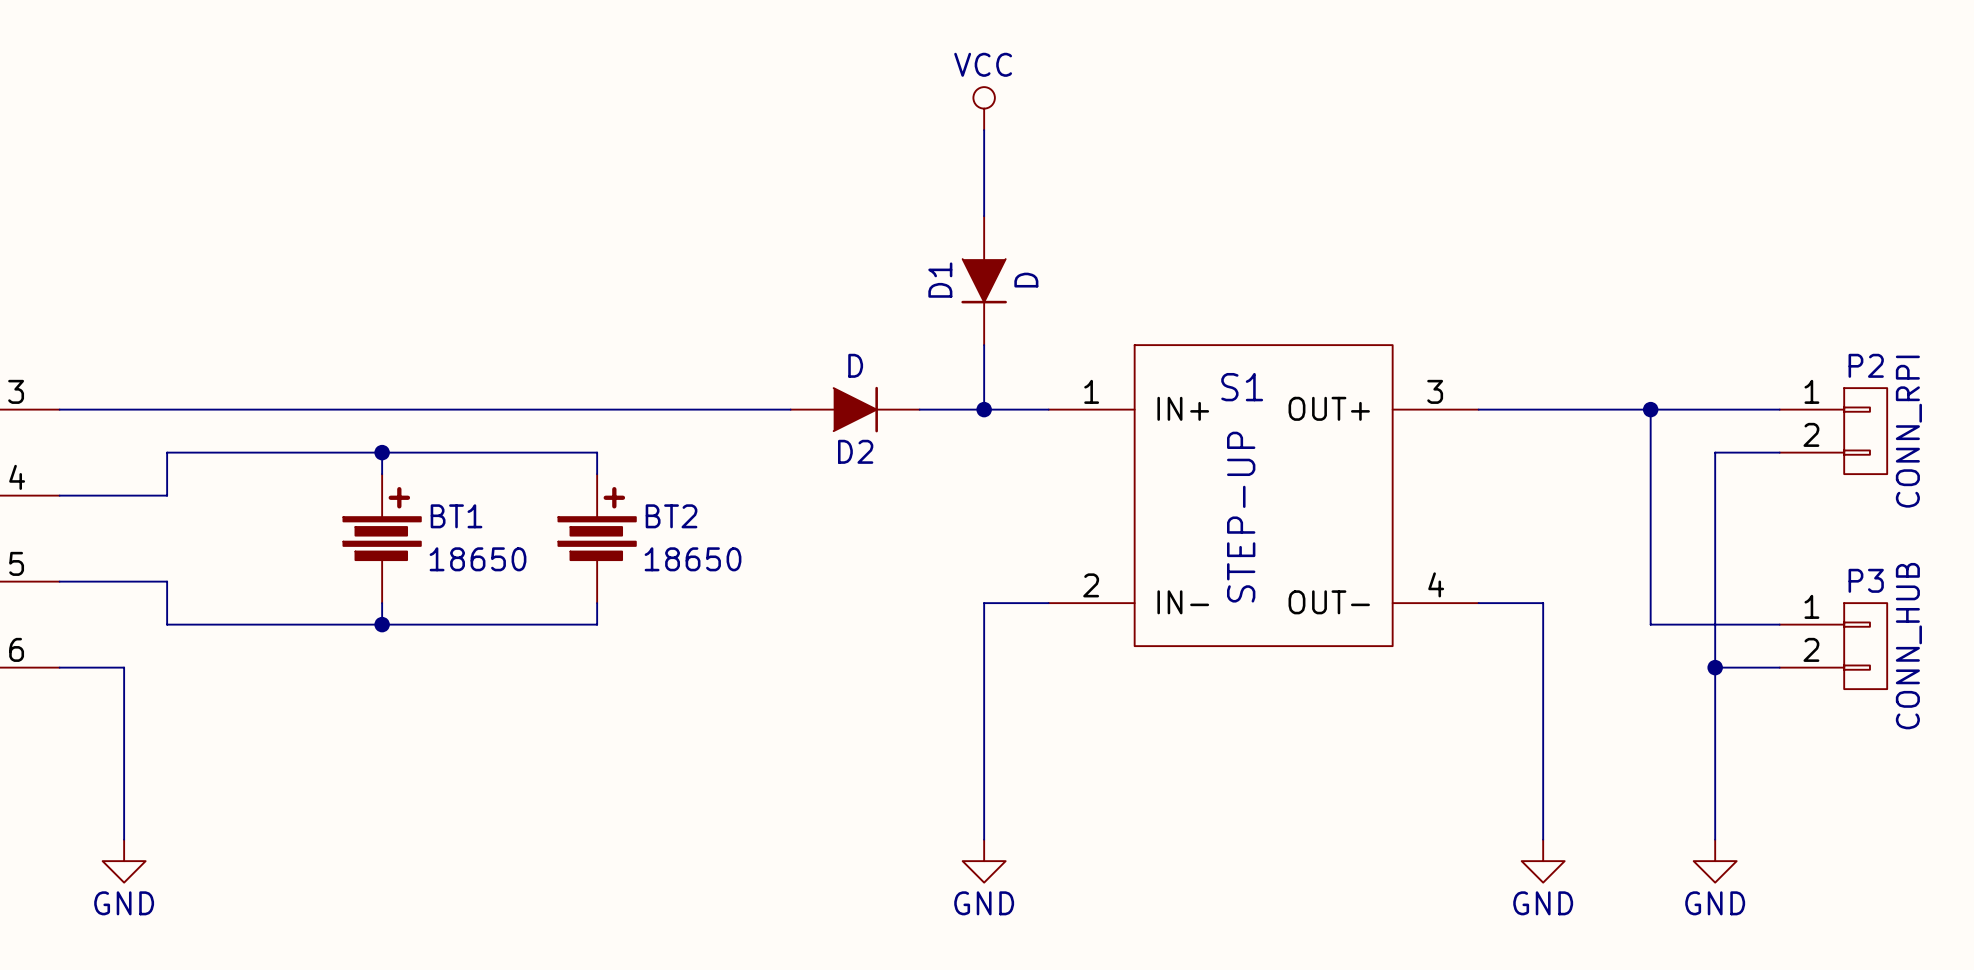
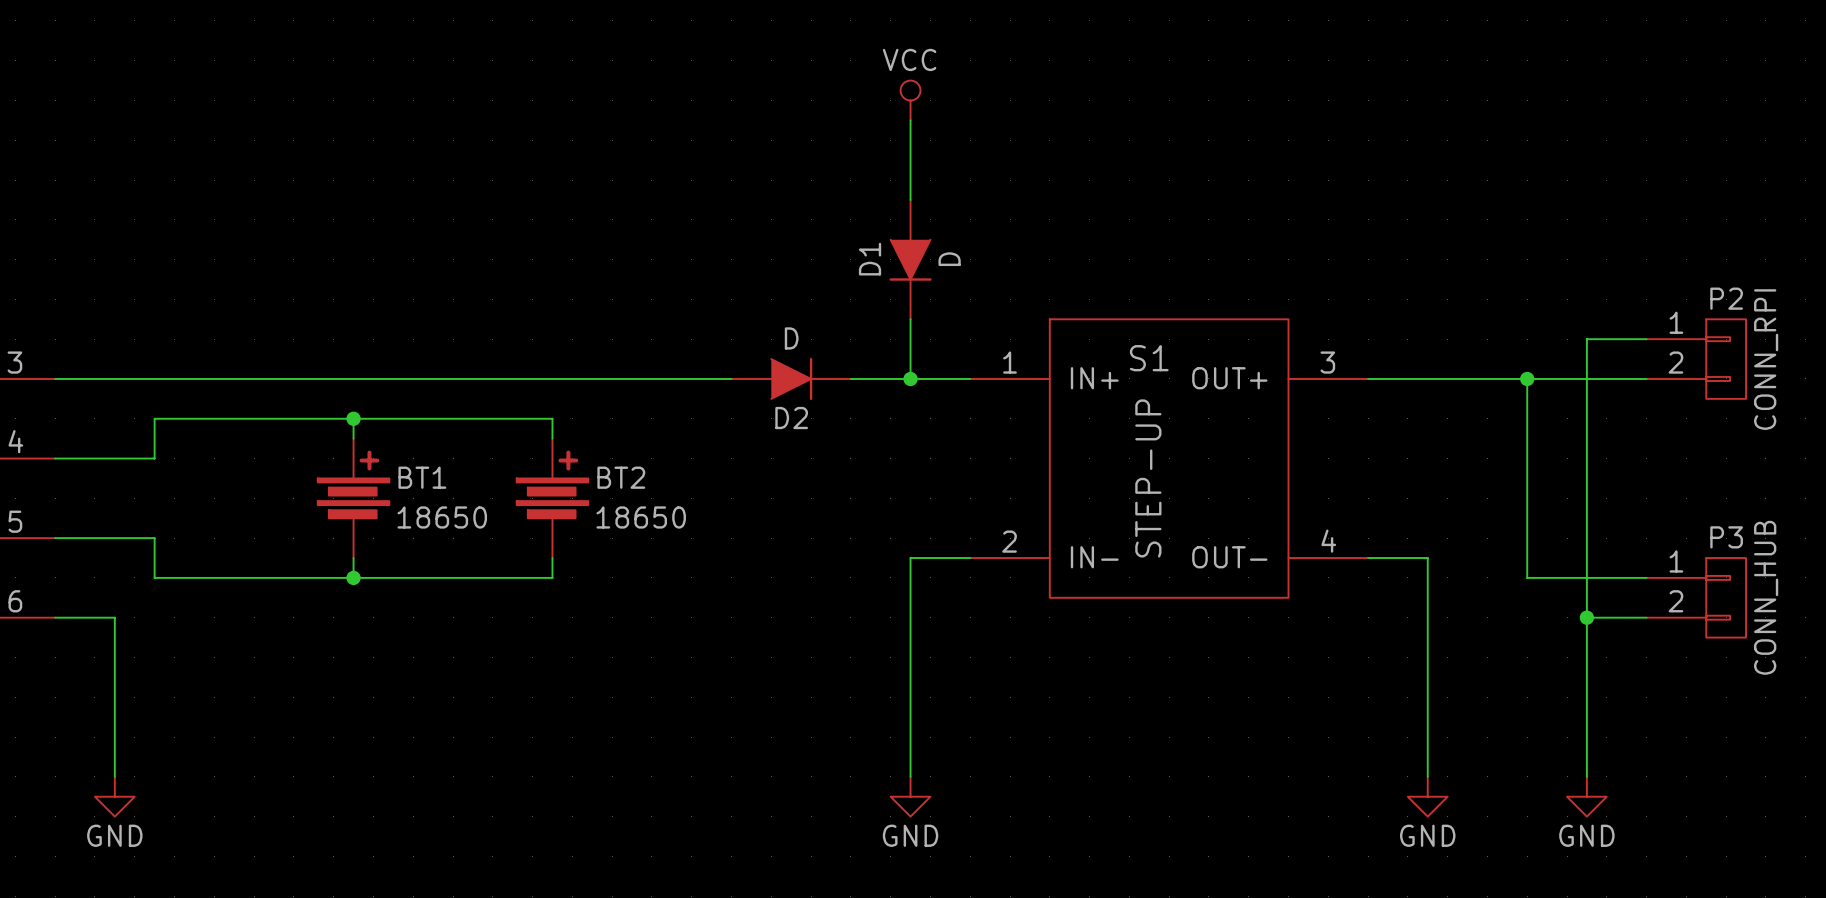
P2 position: (1833, 431) -> (1696, 359)
wire: (1715, 452) (1779, 452) -> (1586, 418) (1586, 339) (1646, 339)

